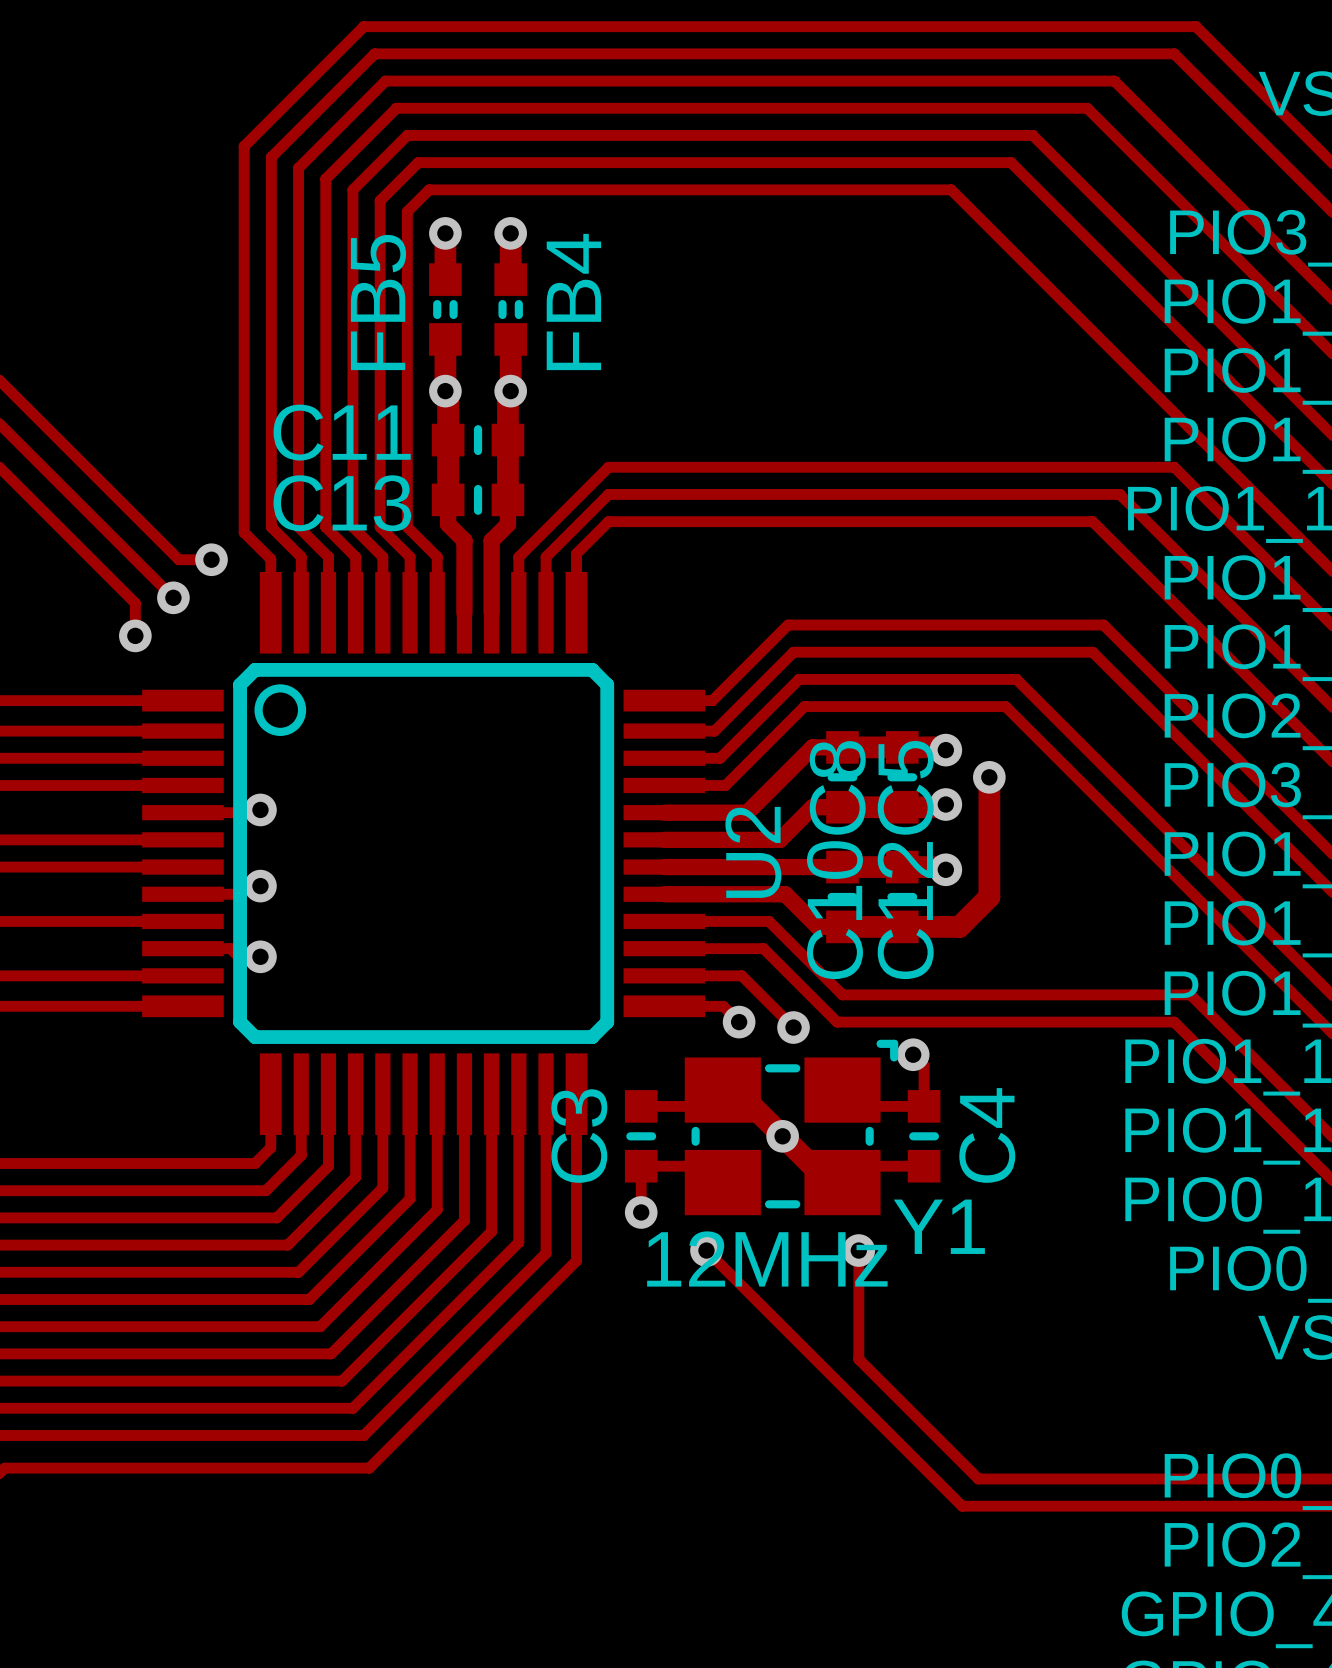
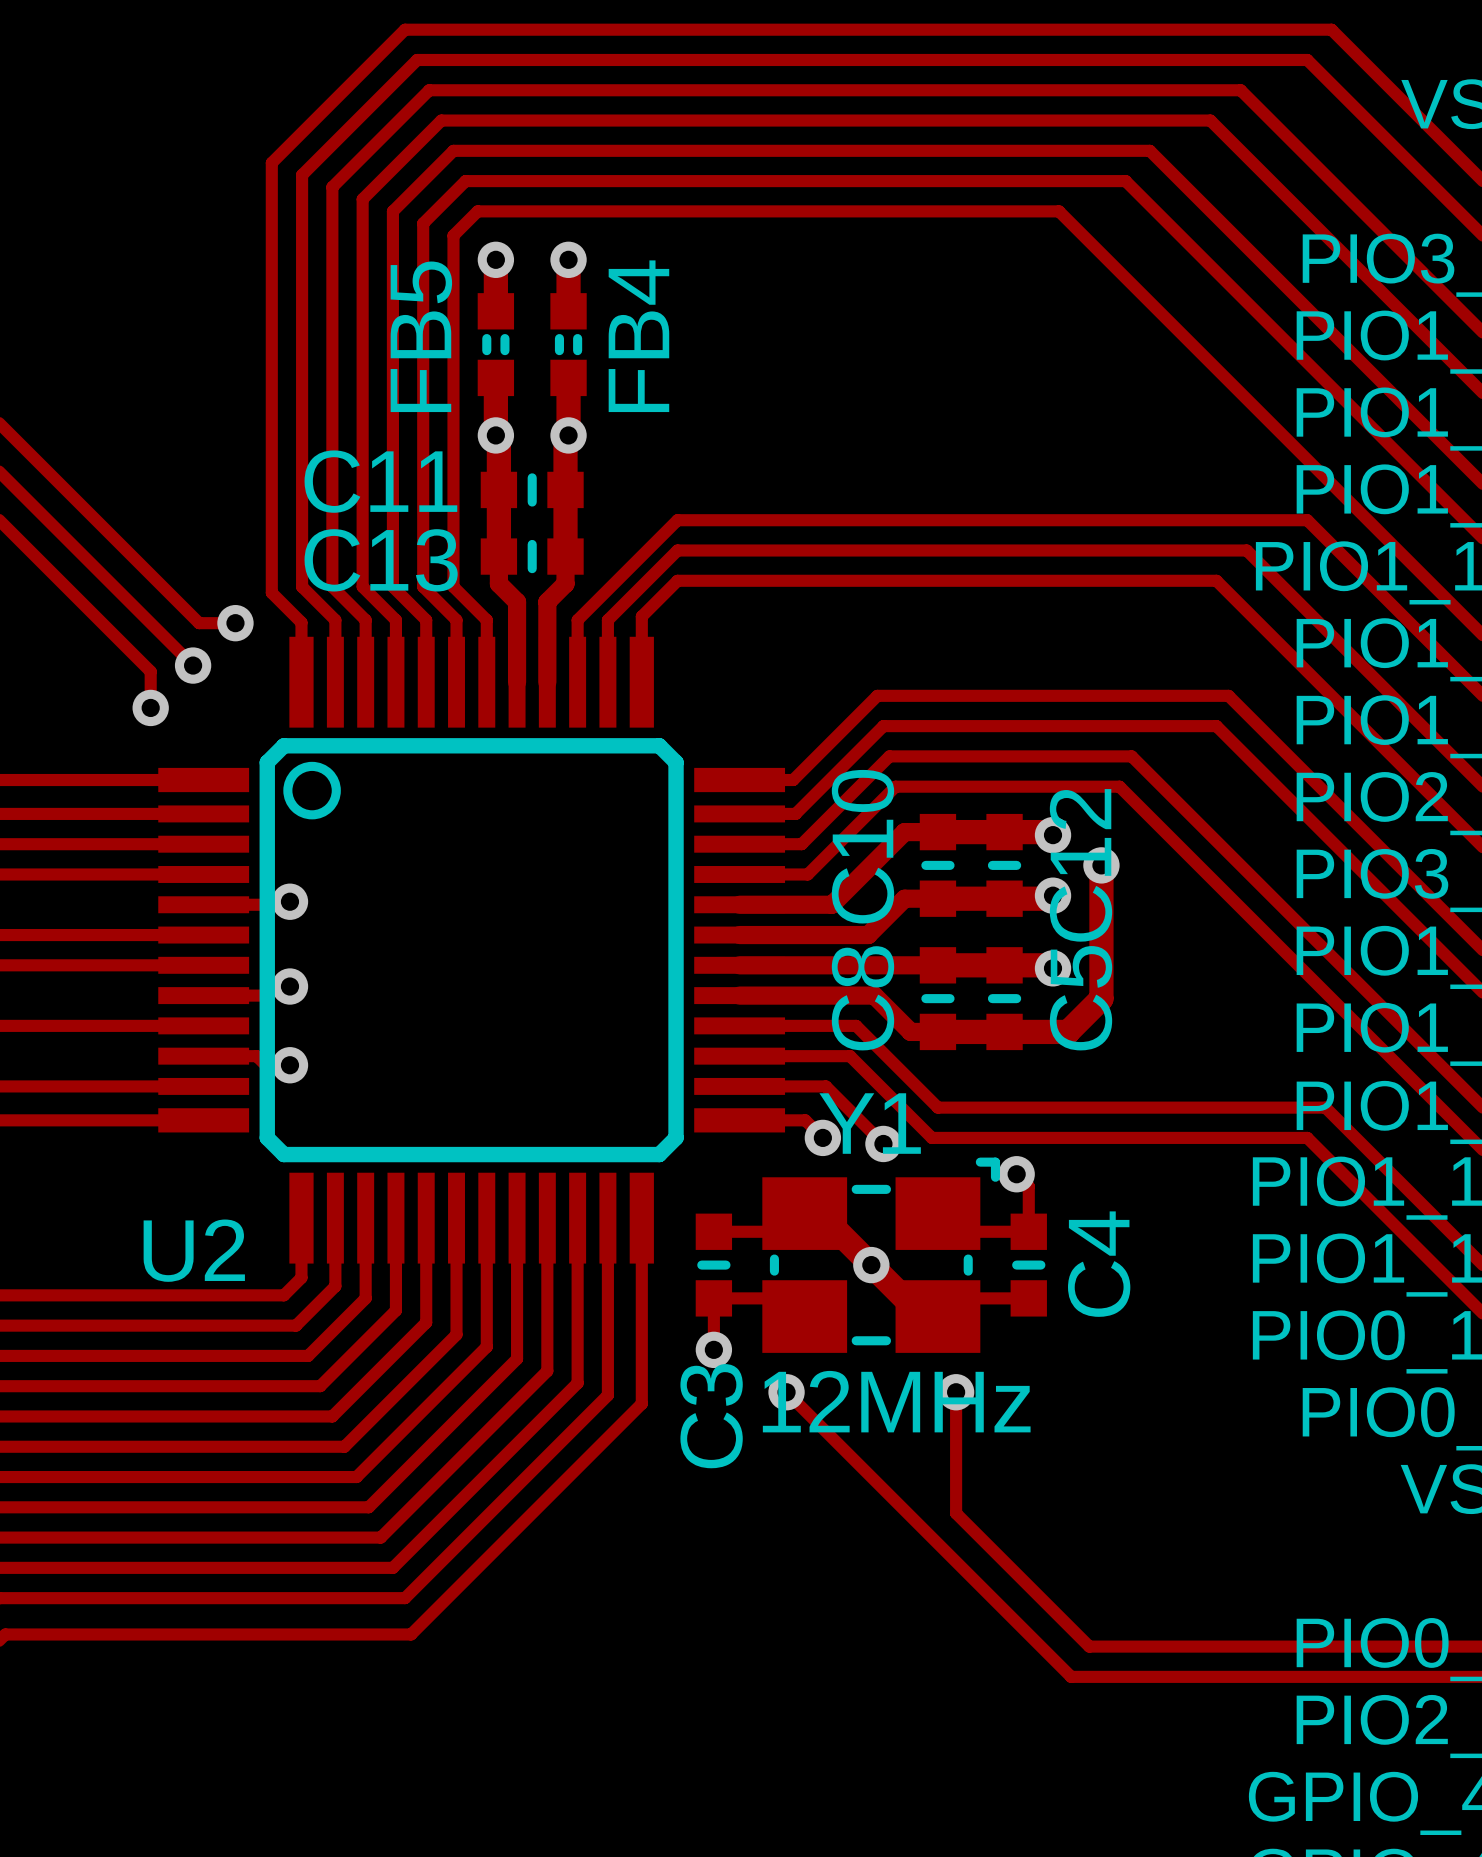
C8 name position: C8 (837, 787) -> C8 (862, 998)
C5 name position: C5 (905, 787) -> C5 (1080, 998)
U2 name rotation: 0° (753, 852) -> 90° clockwise (194, 1250)
U2 name position: U2 (753, 852) -> U2 (194, 1250)
C10 name position: C10 (834, 910) -> C10 (862, 846)
C12 name position: C12 (905, 910) -> C12 (1080, 865)
C3 name position: C3 (579, 1136) -> C3 (711, 1416)
Y1 name position: Y1 (939, 1226) -> Y1 (870, 1123)
Y1 value position: 12MHz (767, 1258) -> 12MHz (896, 1401)

